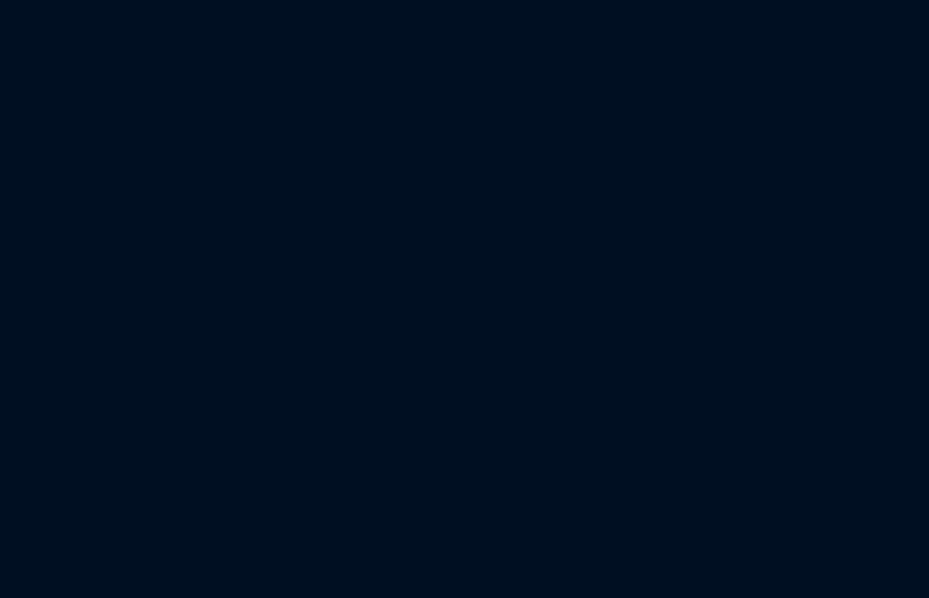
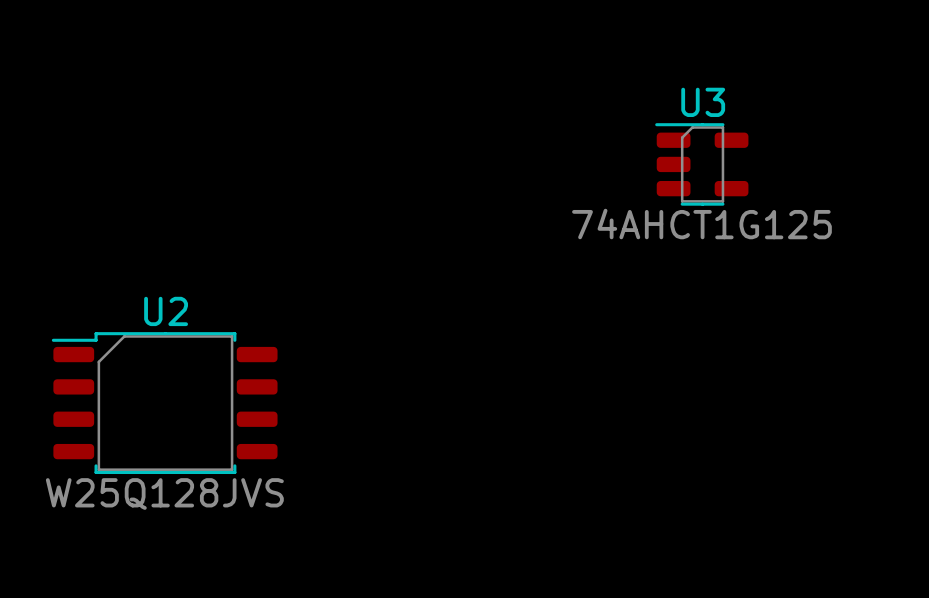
U3: none -> 74AHCT1G125 (701, 164)
U2: none -> W25Q128JVS (164, 403)

